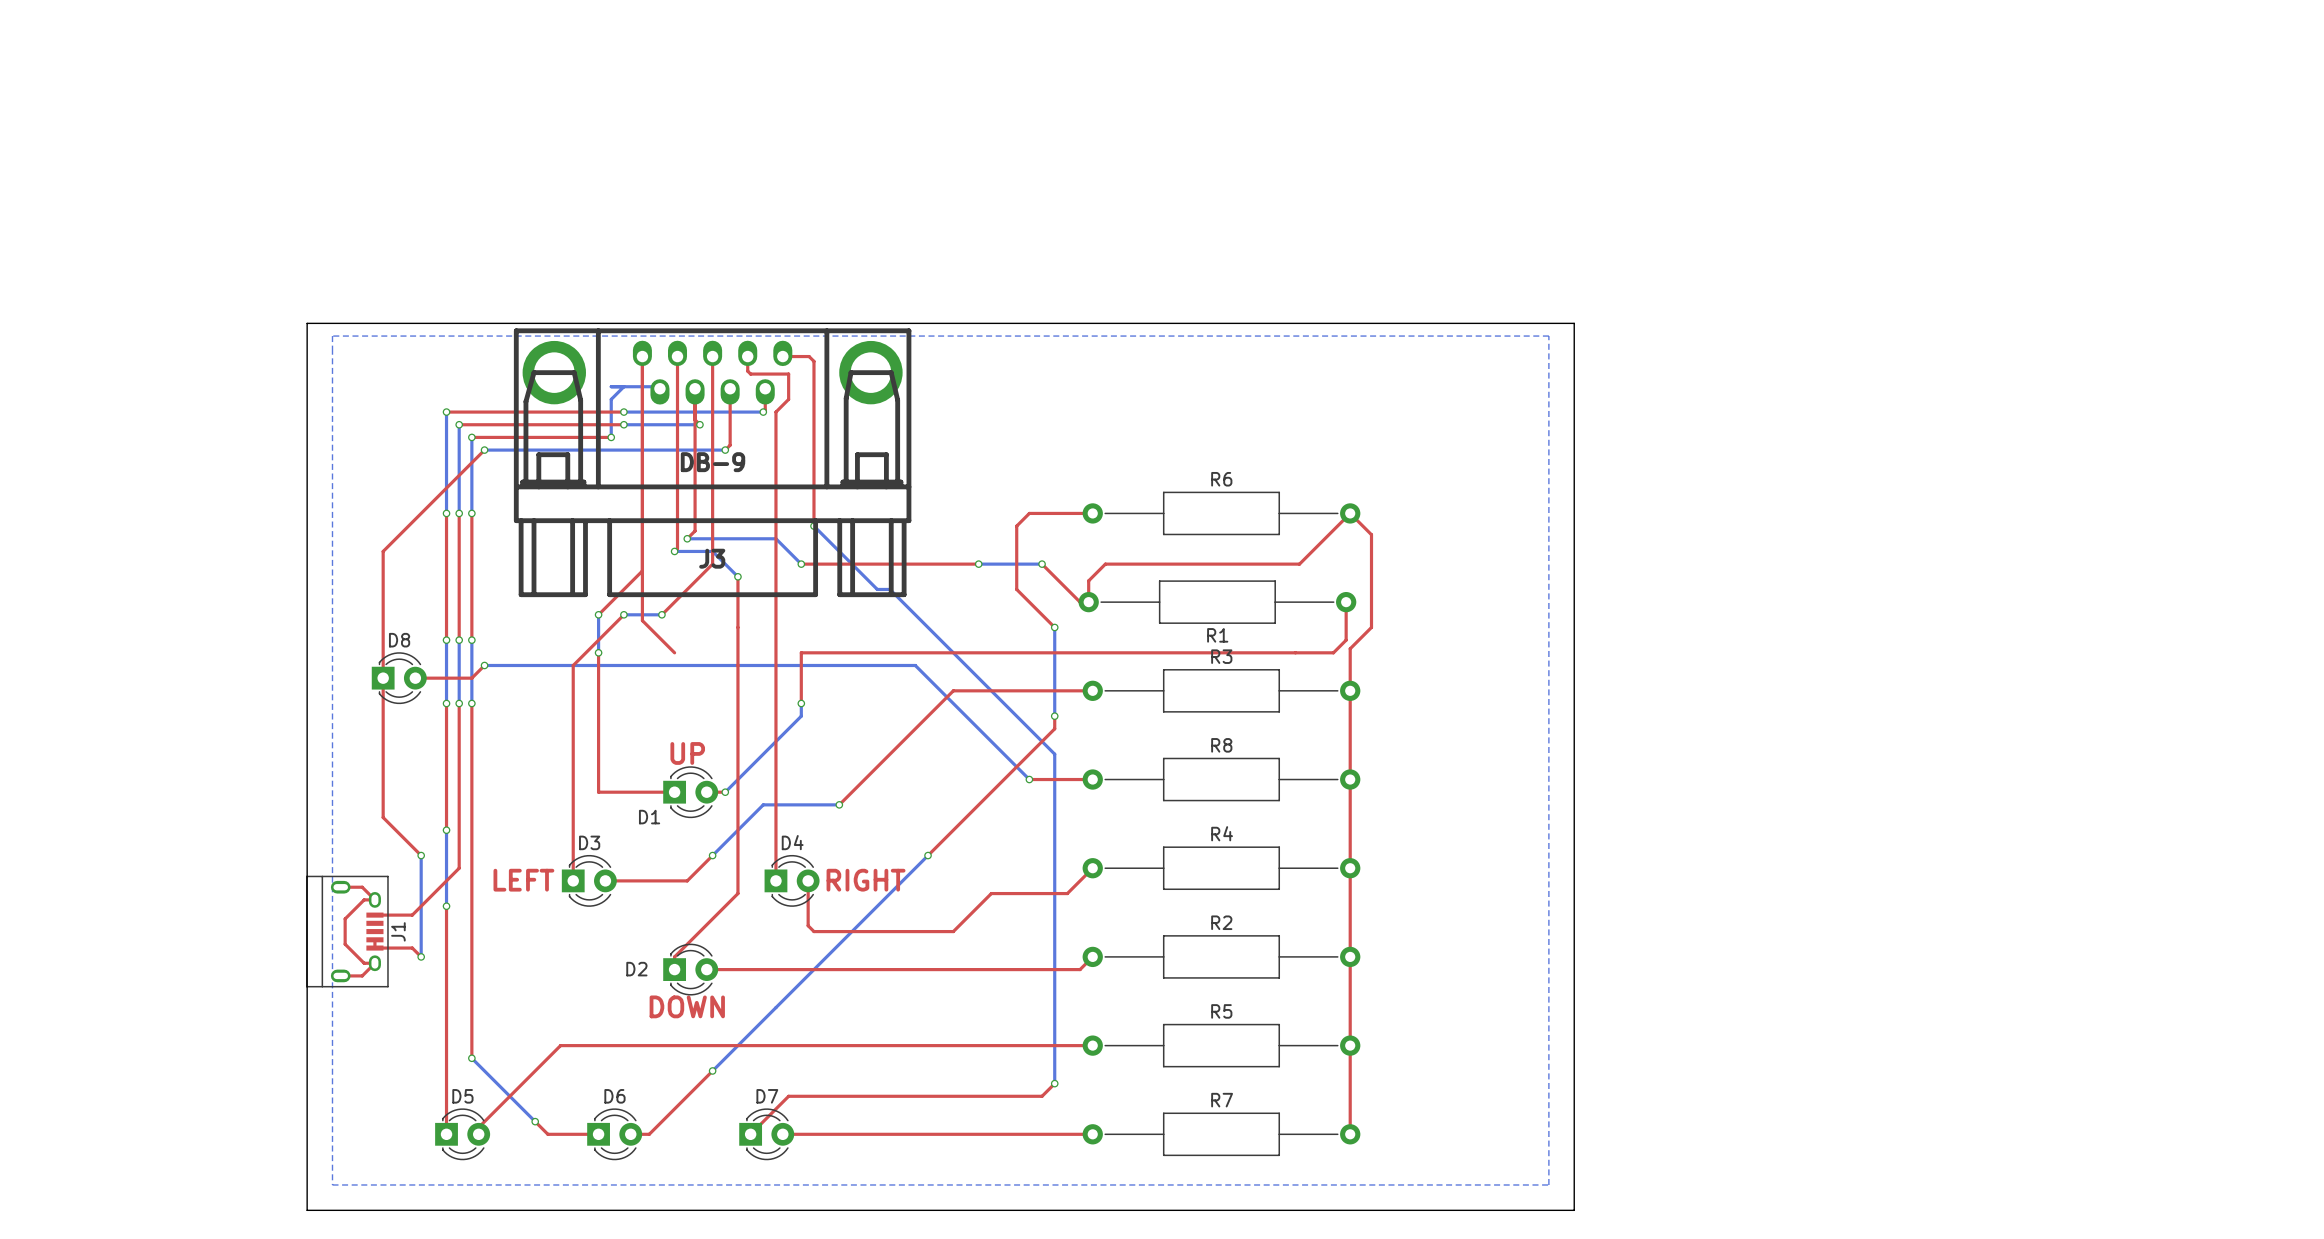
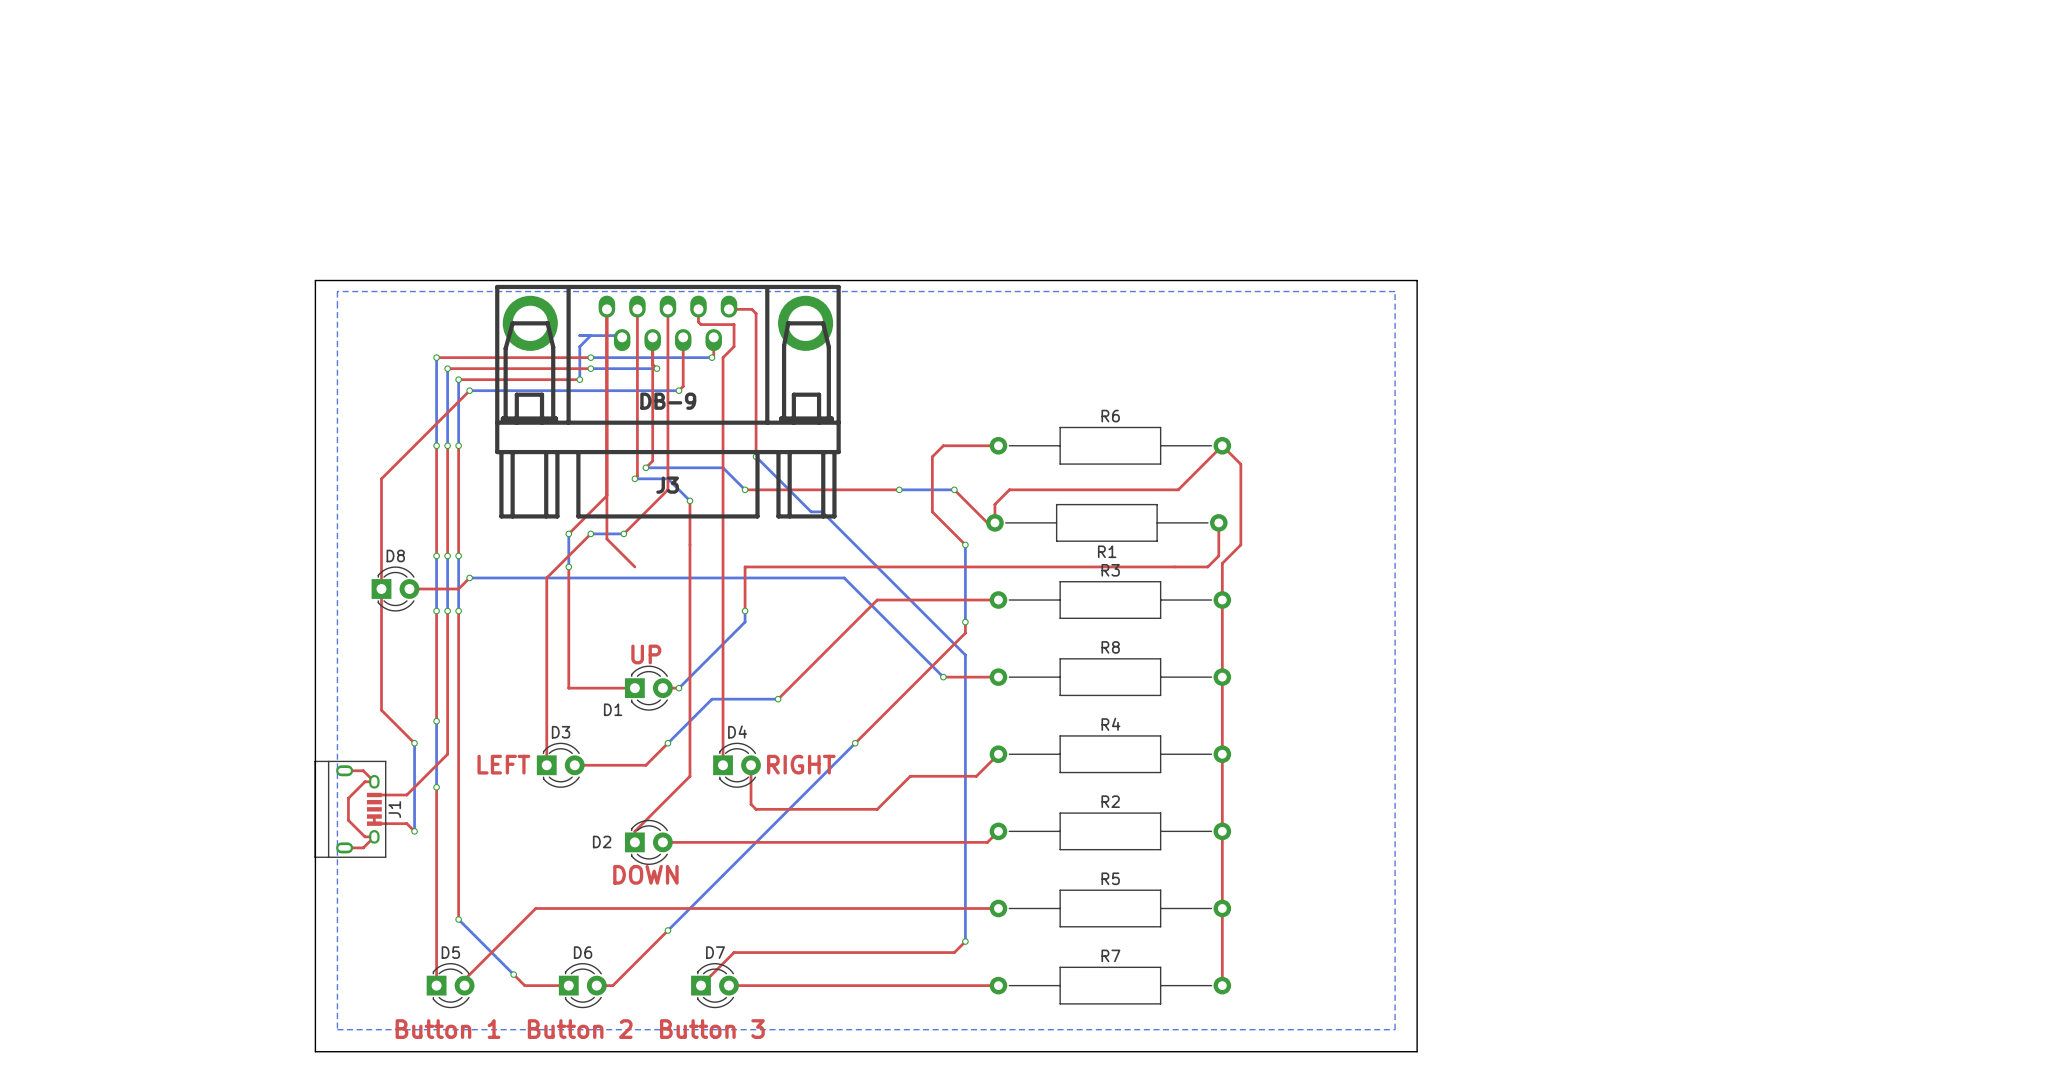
text: none -> Button 1 (448, 1029)
text: none -> Button 2 (580, 1029)
text: none -> Button 3 (712, 1029)

